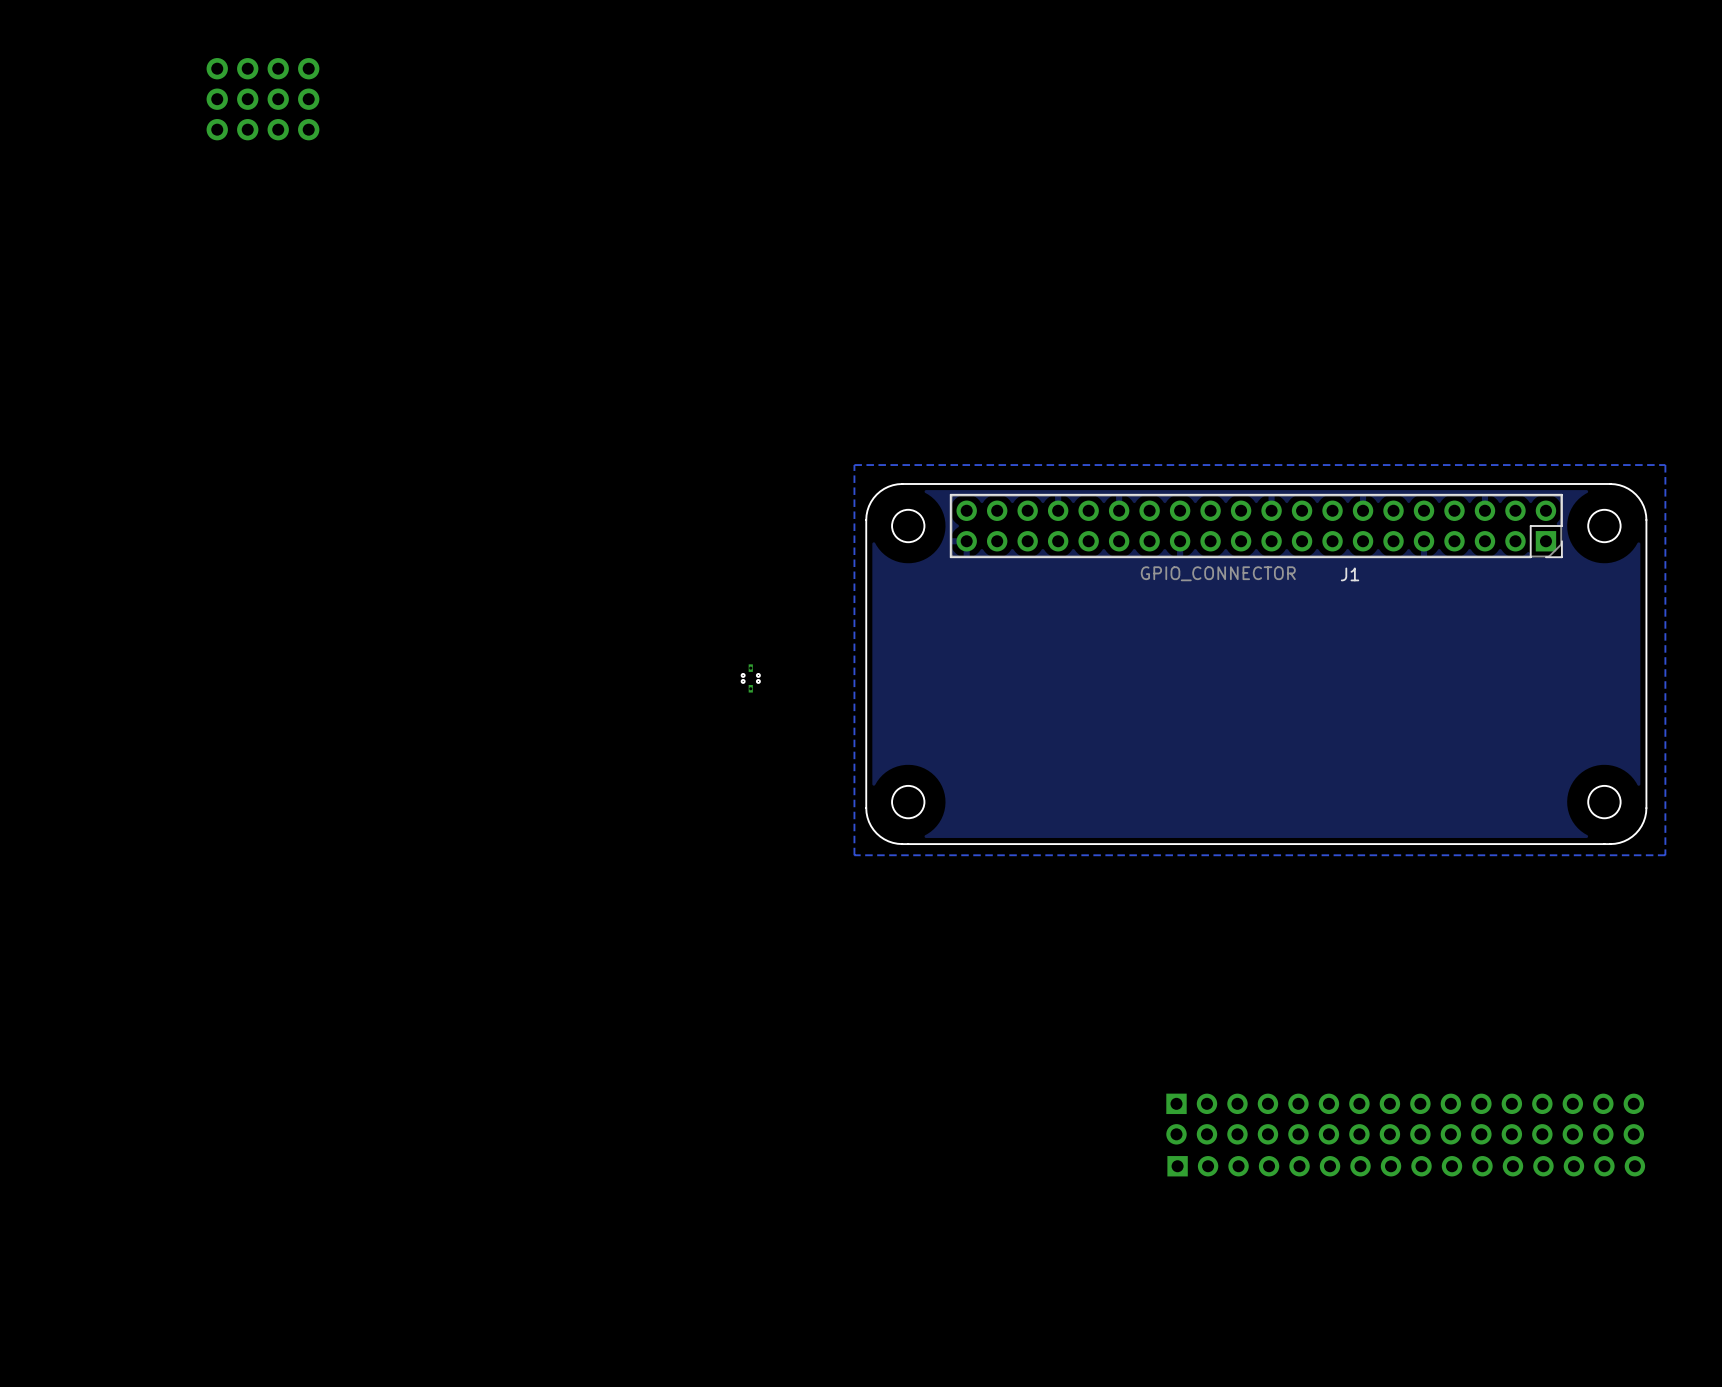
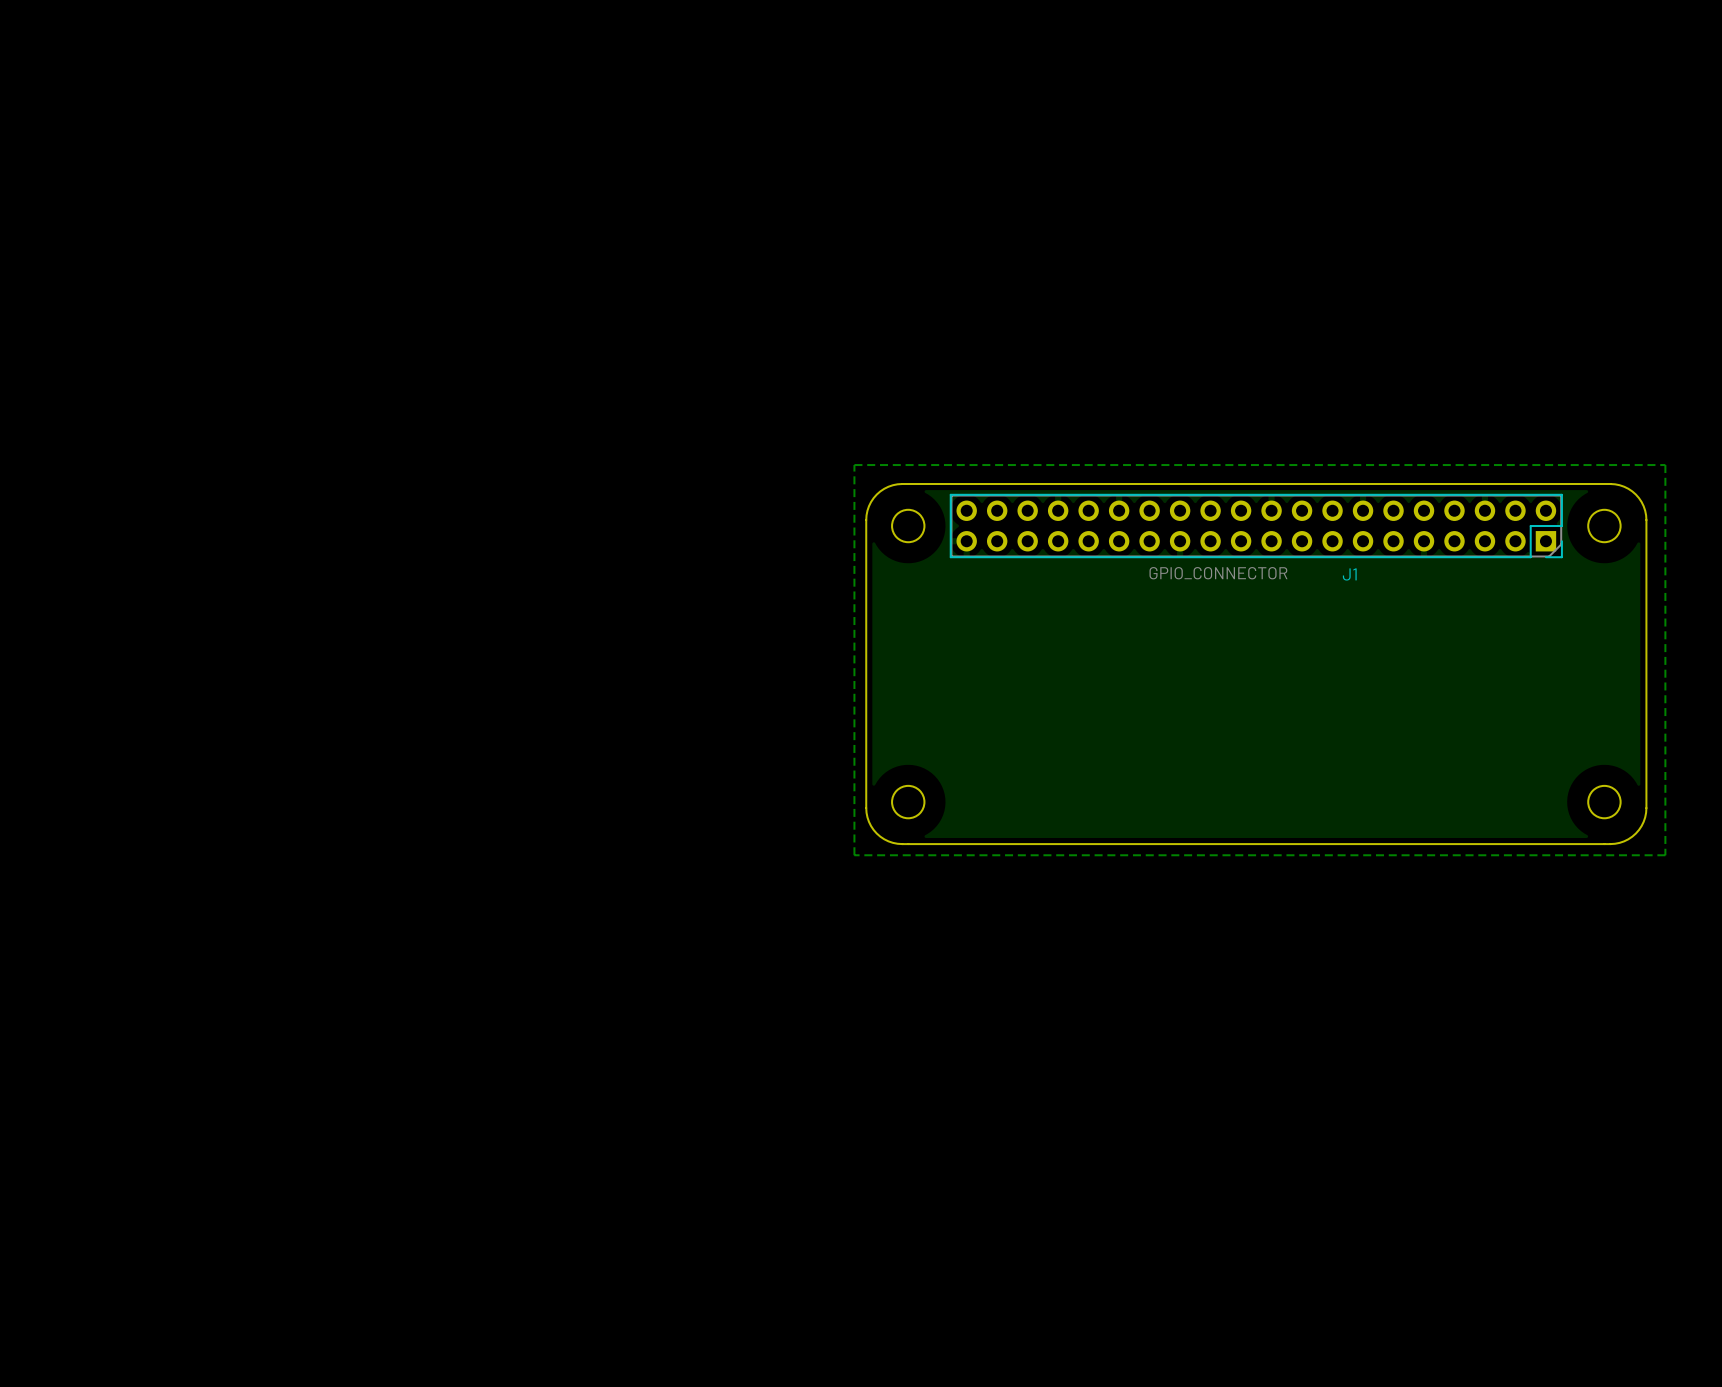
part: (262, 99) -> none
part: (750, 678) -> none
part: (1405, 1119) -> none
part: (1406, 1166) -> none

